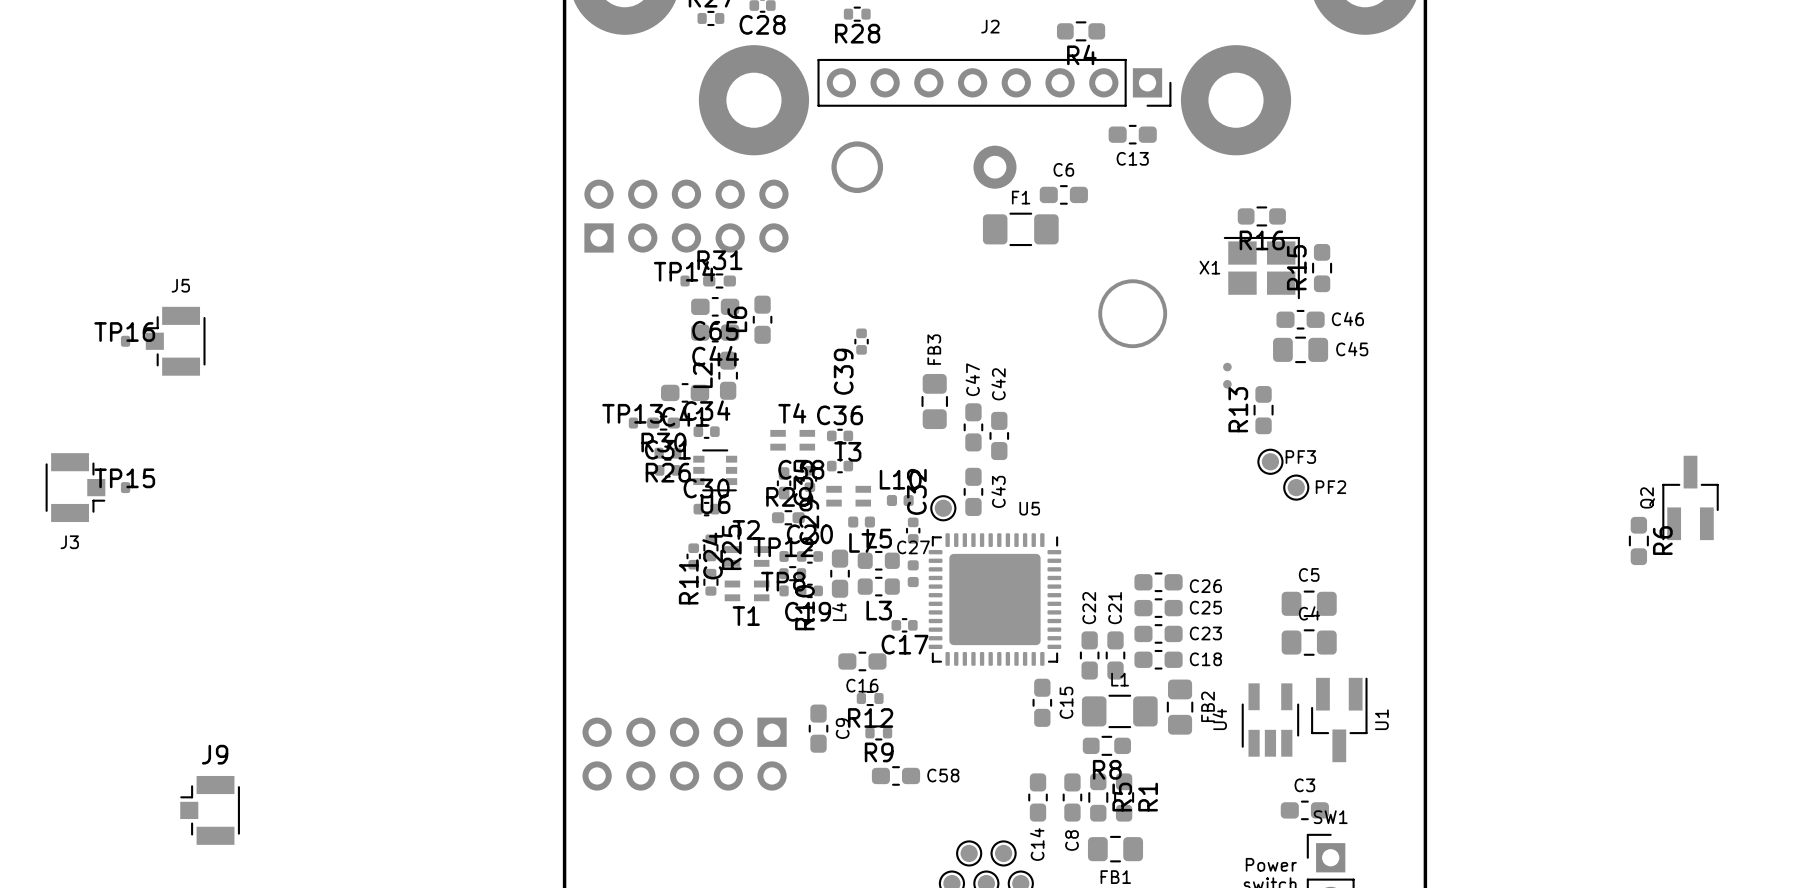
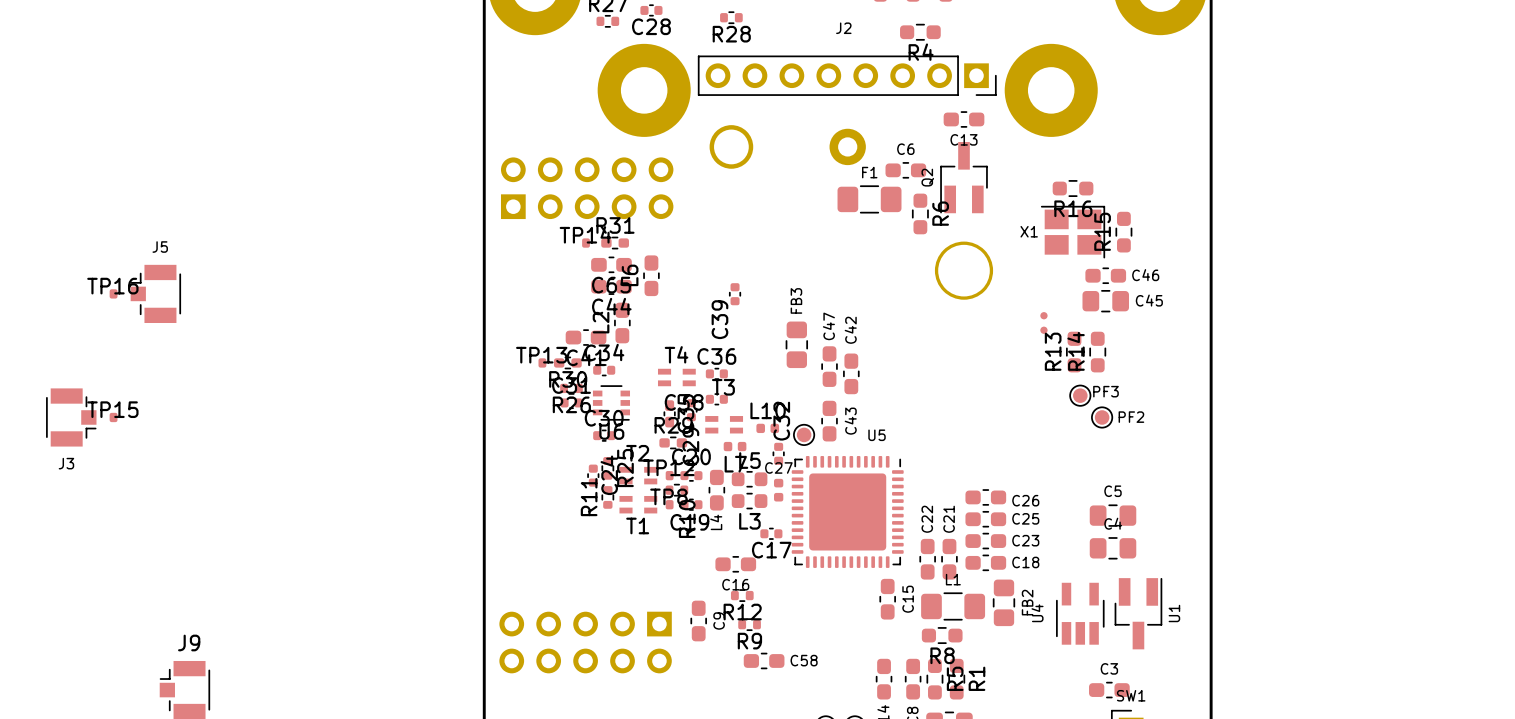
R14: none -> (1097, 352)
Q2 position: (1690, 498) -> (964, 177)
R6 position: (1638, 540) -> (920, 213)

